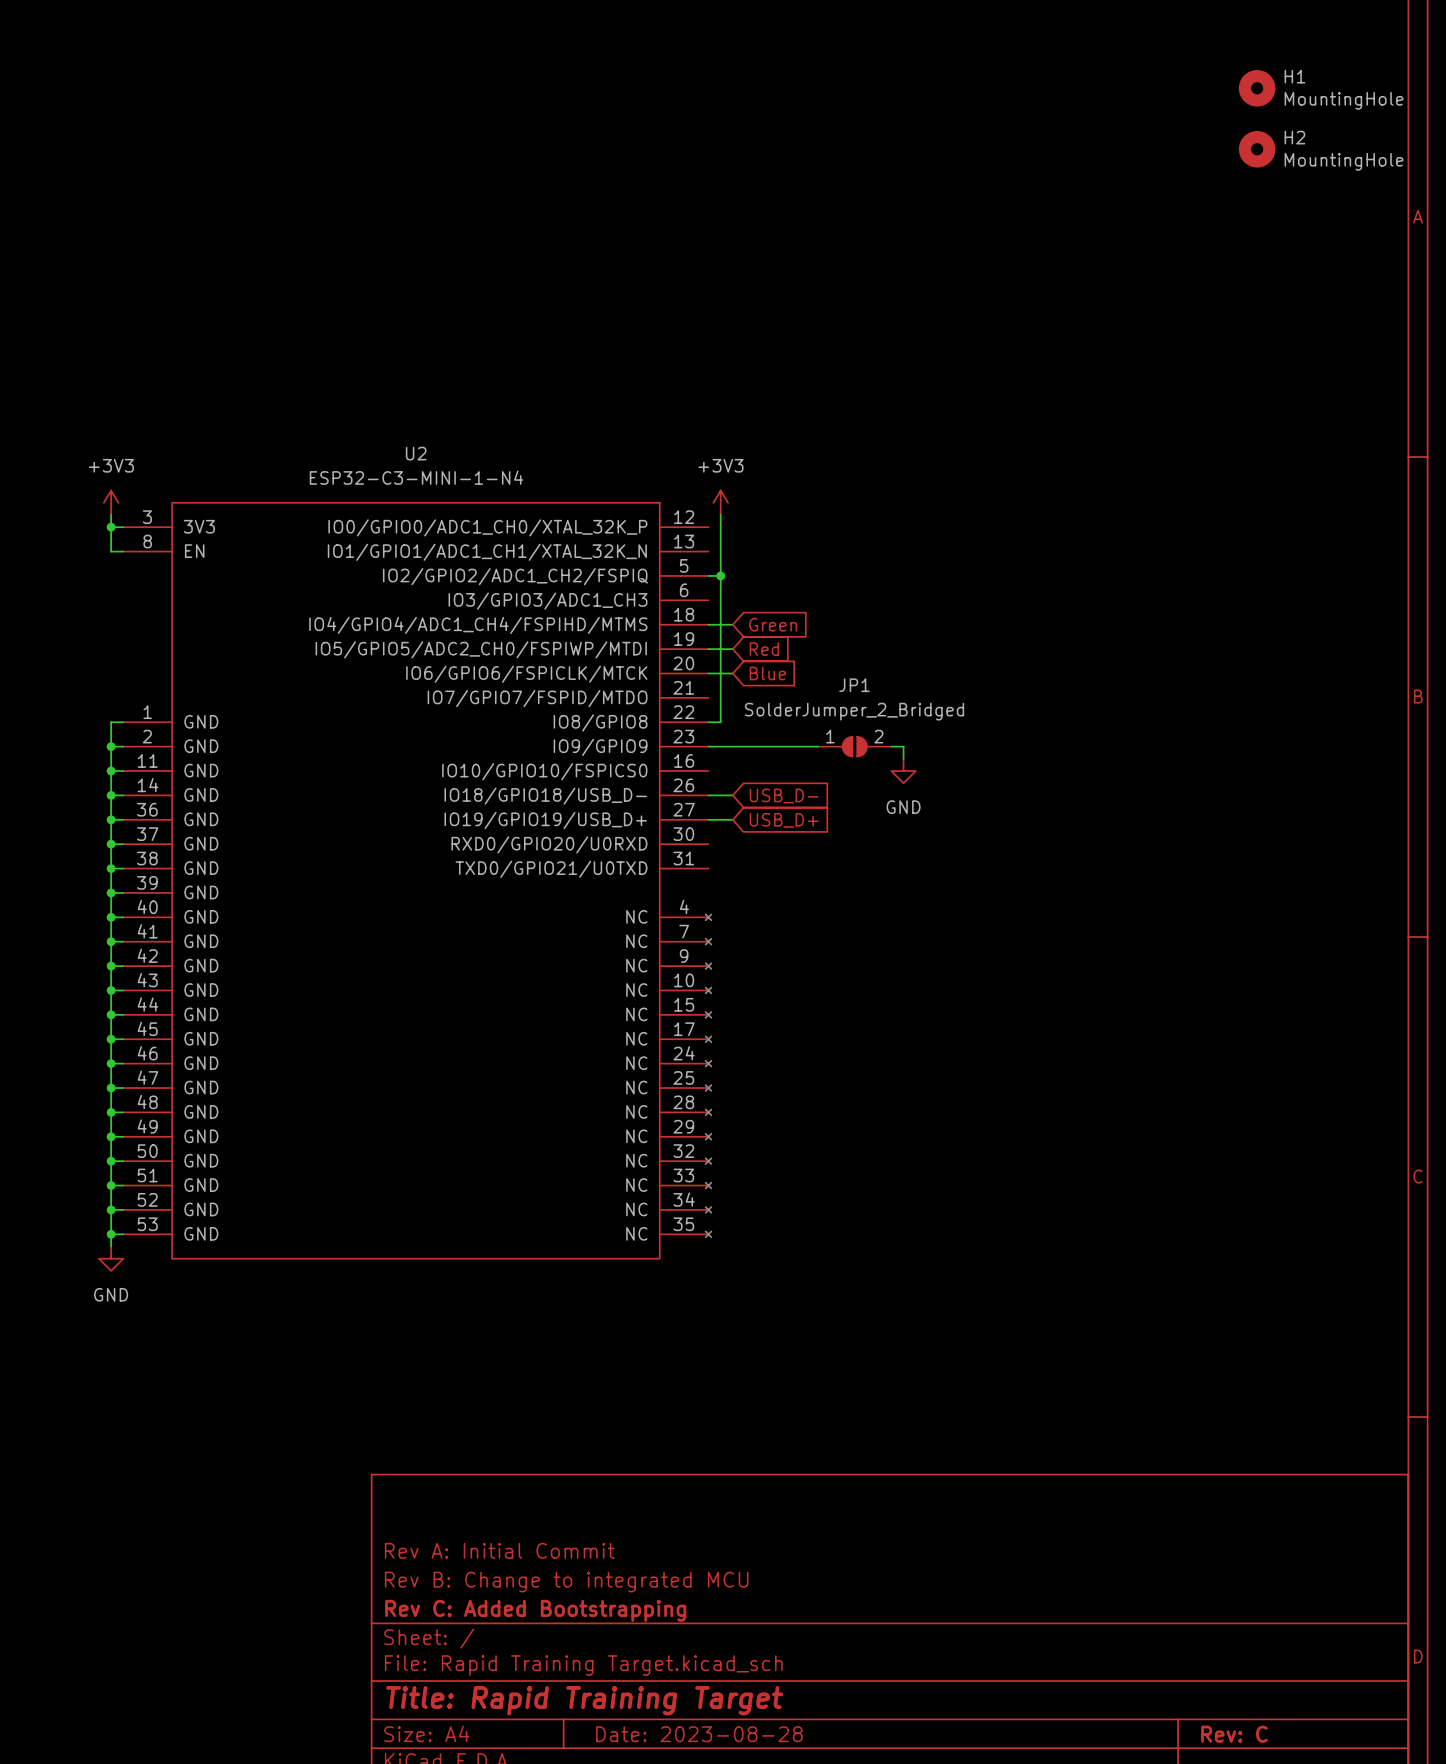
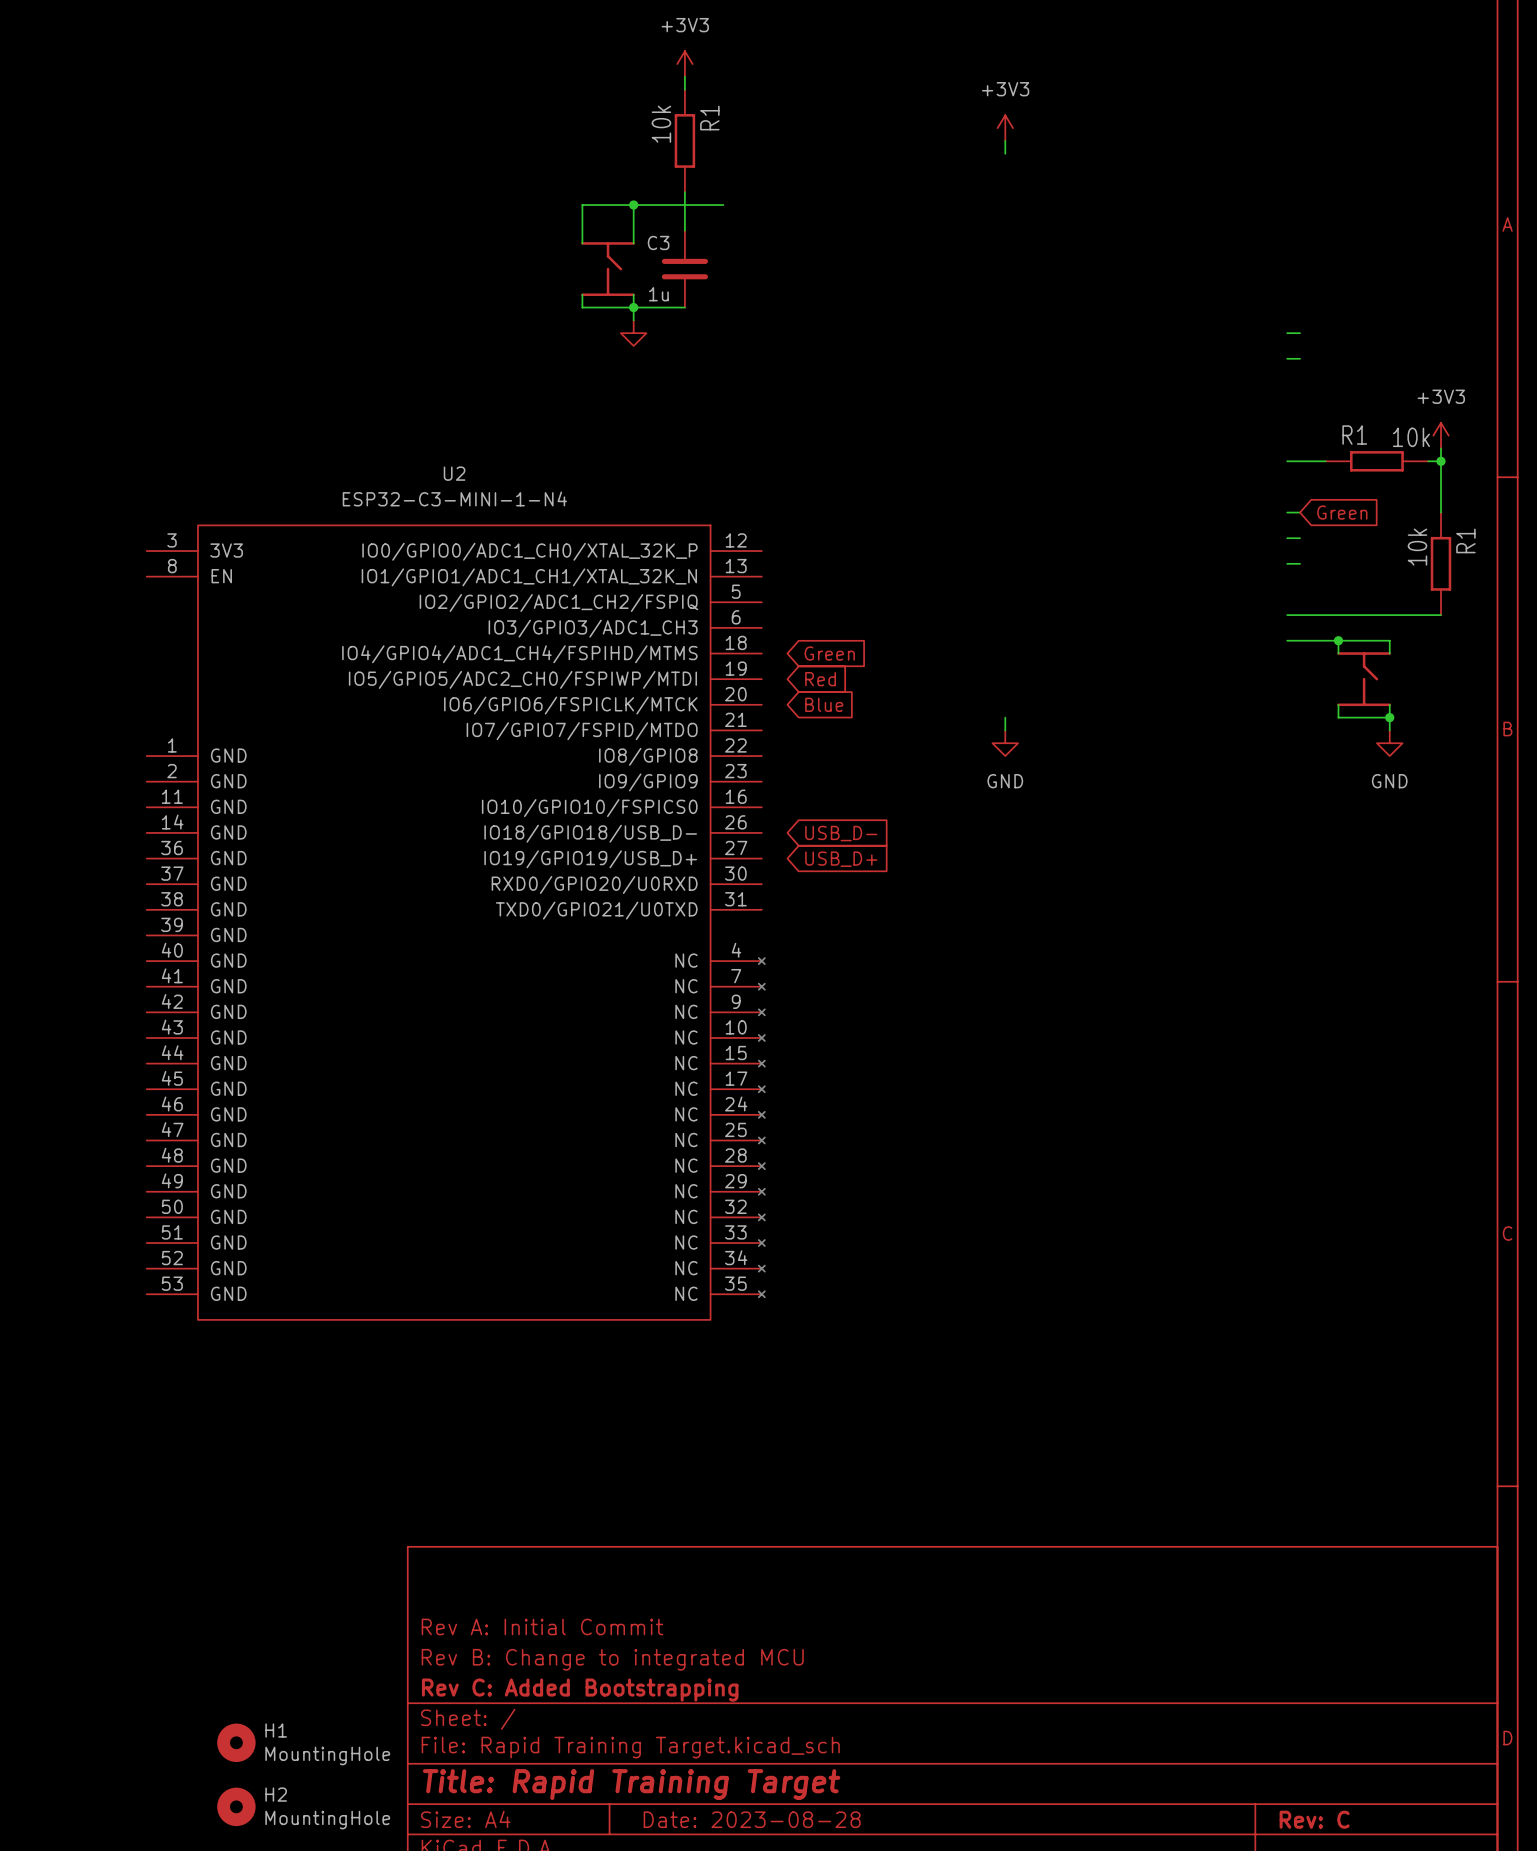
power symbol: none -> +3V3 (684, 64)
wire: none -> (684, 76) (684, 89)
H1 position: (1257, 88) -> (236, 1742)
power symbol: none -> +3V3 (1005, 128)
R1: none -> 10k (684, 140)
wire: none -> (1005, 140) (1005, 153)
H2 position: (1257, 149) -> (236, 1806)
wire: none -> (684, 192) (684, 230)
wire: none -> (633, 205) (633, 243)
junction: none -> (633, 205)
wire: none -> (723, 205) (582, 205) (582, 243)
part: none -> (608, 269)
C3: none -> 1u (684, 269)
wire: none -> (582, 294) (582, 307) (684, 307)
wire: none -> (633, 294) (633, 320)
junction: none -> (633, 307)
power symbol: none -> (633, 333)
wire: none -> (1287, 333) (1300, 333)
wire: none -> (1287, 358) (1300, 358)
power symbol: none -> +3V3 (1440, 435)
wire: none -> (1440, 448) (1440, 512)
wire: none -> (1287, 461) (1325, 461)
R1: none -> 10k (1376, 461)
wire: none -> (1428, 461) (1440, 461)
junction: none -> (1440, 461)
wire: none -> (1287, 512) (1300, 512)
global label: none -> Green (1342, 512)
power symbol: +3V3 (111, 502) -> none
power symbol: +3V3 (720, 502) -> none
wire: (111, 515) (111, 551) (123, 551) -> none
wire: (720, 515) (720, 722) (708, 722) -> none
wire: none -> (1287, 538) (1300, 538)
wire: (111, 527) (123, 527) -> none
junction: (111, 527) -> none
wire: none -> (1287, 563) (1300, 563)
R1: none -> 10k (1440, 563)
wire: (708, 575) (720, 575) -> none
junction: (720, 575) -> none
wire: none -> (1287, 615) (1440, 615)
wire: none -> (1287, 640) (1389, 640) (1389, 653)
wire: none -> (1338, 640) (1338, 653)
junction: none -> (1338, 640)
wire: (708, 624) (732, 624) -> none
wire: (708, 649) (732, 649) -> none
part: none -> (1364, 679)
wire: (708, 673) (732, 673) -> none
wire: none -> (1338, 704) (1338, 717) (1389, 717)
wire: none -> (1389, 704) (1389, 730)
wire: none -> (1005, 717) (1005, 730)
junction: none -> (1389, 717)
power symbol: none -> GND (1389, 743)
wire: (123, 722) (111, 722) (111, 1246) -> none
wire: (111, 746) (123, 746) -> none
junction: (111, 746) -> none
wire: (708, 746) (818, 746) -> none
JP1: SolderJumper_2_Bridged (854, 746) -> none
wire: (891, 746) (903, 746) (903, 758) -> none
wire: (111, 771) (123, 771) -> none
junction: (111, 771) -> none
power symbol position: GND (903, 771) -> GND (1005, 743)
wire: (111, 795) (123, 795) -> none
junction: (111, 795) -> none
wire: (708, 795) (732, 795) -> none
wire: (111, 819) (123, 819) -> none
junction: (111, 819) -> none
wire: (708, 819) (732, 819) -> none
wire: (111, 844) (123, 844) -> none
junction: (111, 844) -> none
wire: (111, 868) (123, 868) -> none
junction: (111, 868) -> none
wire: (111, 892) (123, 892) -> none
junction: (111, 892) -> none
wire: (111, 917) (123, 917) -> none
junction: (111, 917) -> none
wire: (111, 941) (123, 941) -> none
junction: (111, 941) -> none
wire: (111, 966) (123, 966) -> none
junction: (111, 966) -> none
wire: (111, 990) (123, 990) -> none
junction: (111, 990) -> none
wire: (111, 1014) (123, 1014) -> none
junction: (111, 1014) -> none
wire: (111, 1039) (123, 1039) -> none
junction: (111, 1039) -> none
wire: (111, 1063) (123, 1063) -> none
junction: (111, 1063) -> none
wire: (111, 1088) (123, 1088) -> none
junction: (111, 1088) -> none
wire: (111, 1112) (123, 1112) -> none
junction: (111, 1112) -> none
wire: (111, 1136) (123, 1136) -> none
junction: (111, 1136) -> none
wire: (111, 1161) (123, 1161) -> none
junction: (111, 1161) -> none
wire: (111, 1185) (123, 1185) -> none
junction: (111, 1185) -> none
wire: (111, 1209) (123, 1209) -> none
junction: (111, 1209) -> none
wire: (111, 1234) (123, 1234) -> none
junction: (111, 1234) -> none
power symbol: GND (111, 1258) -> none

